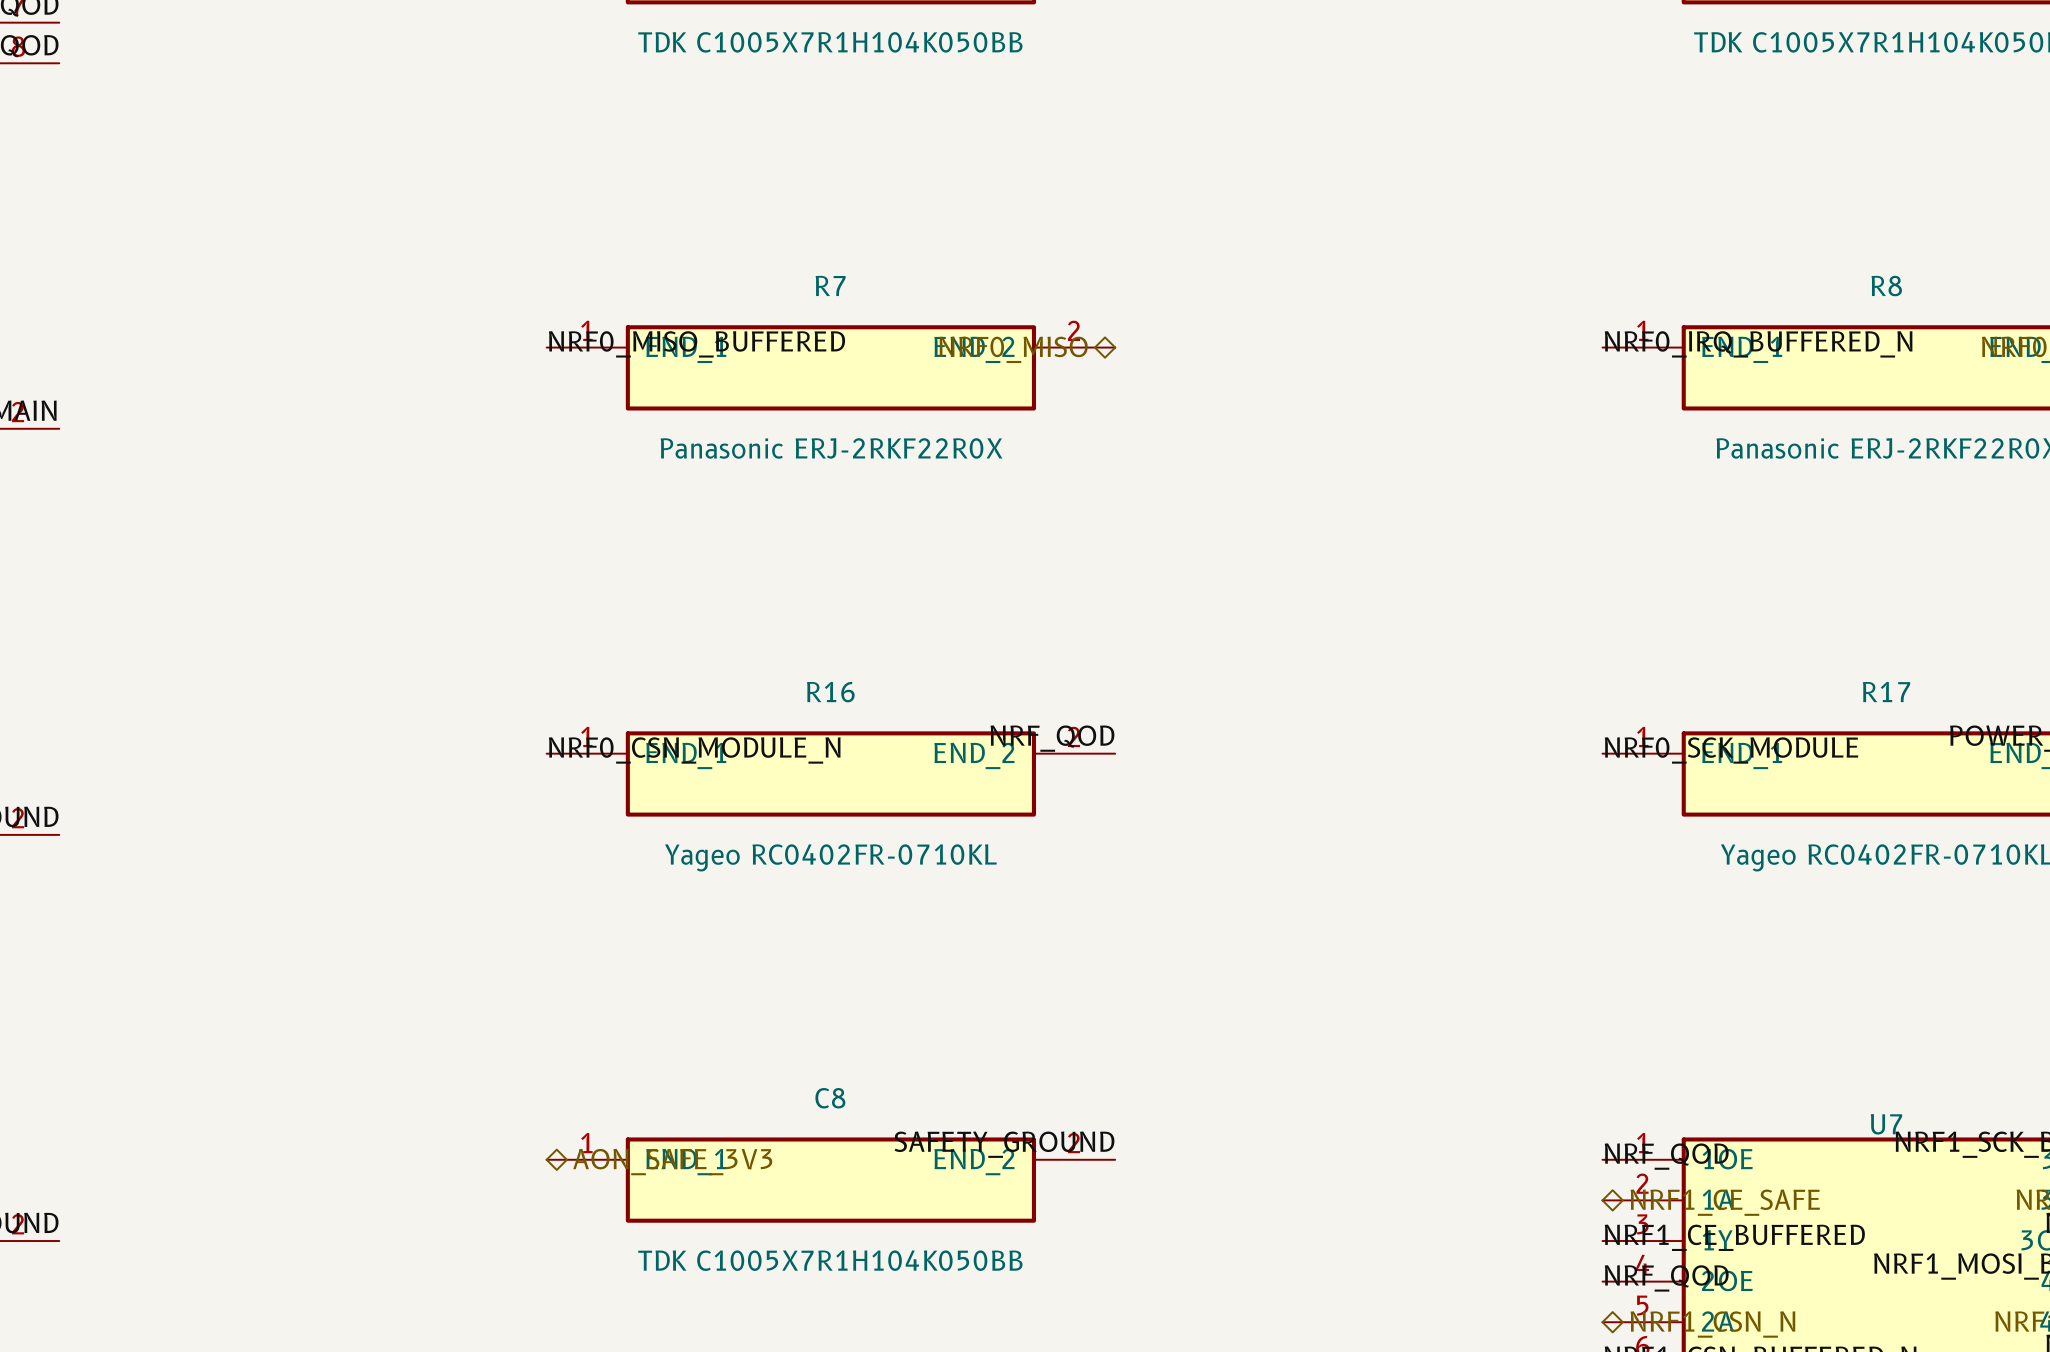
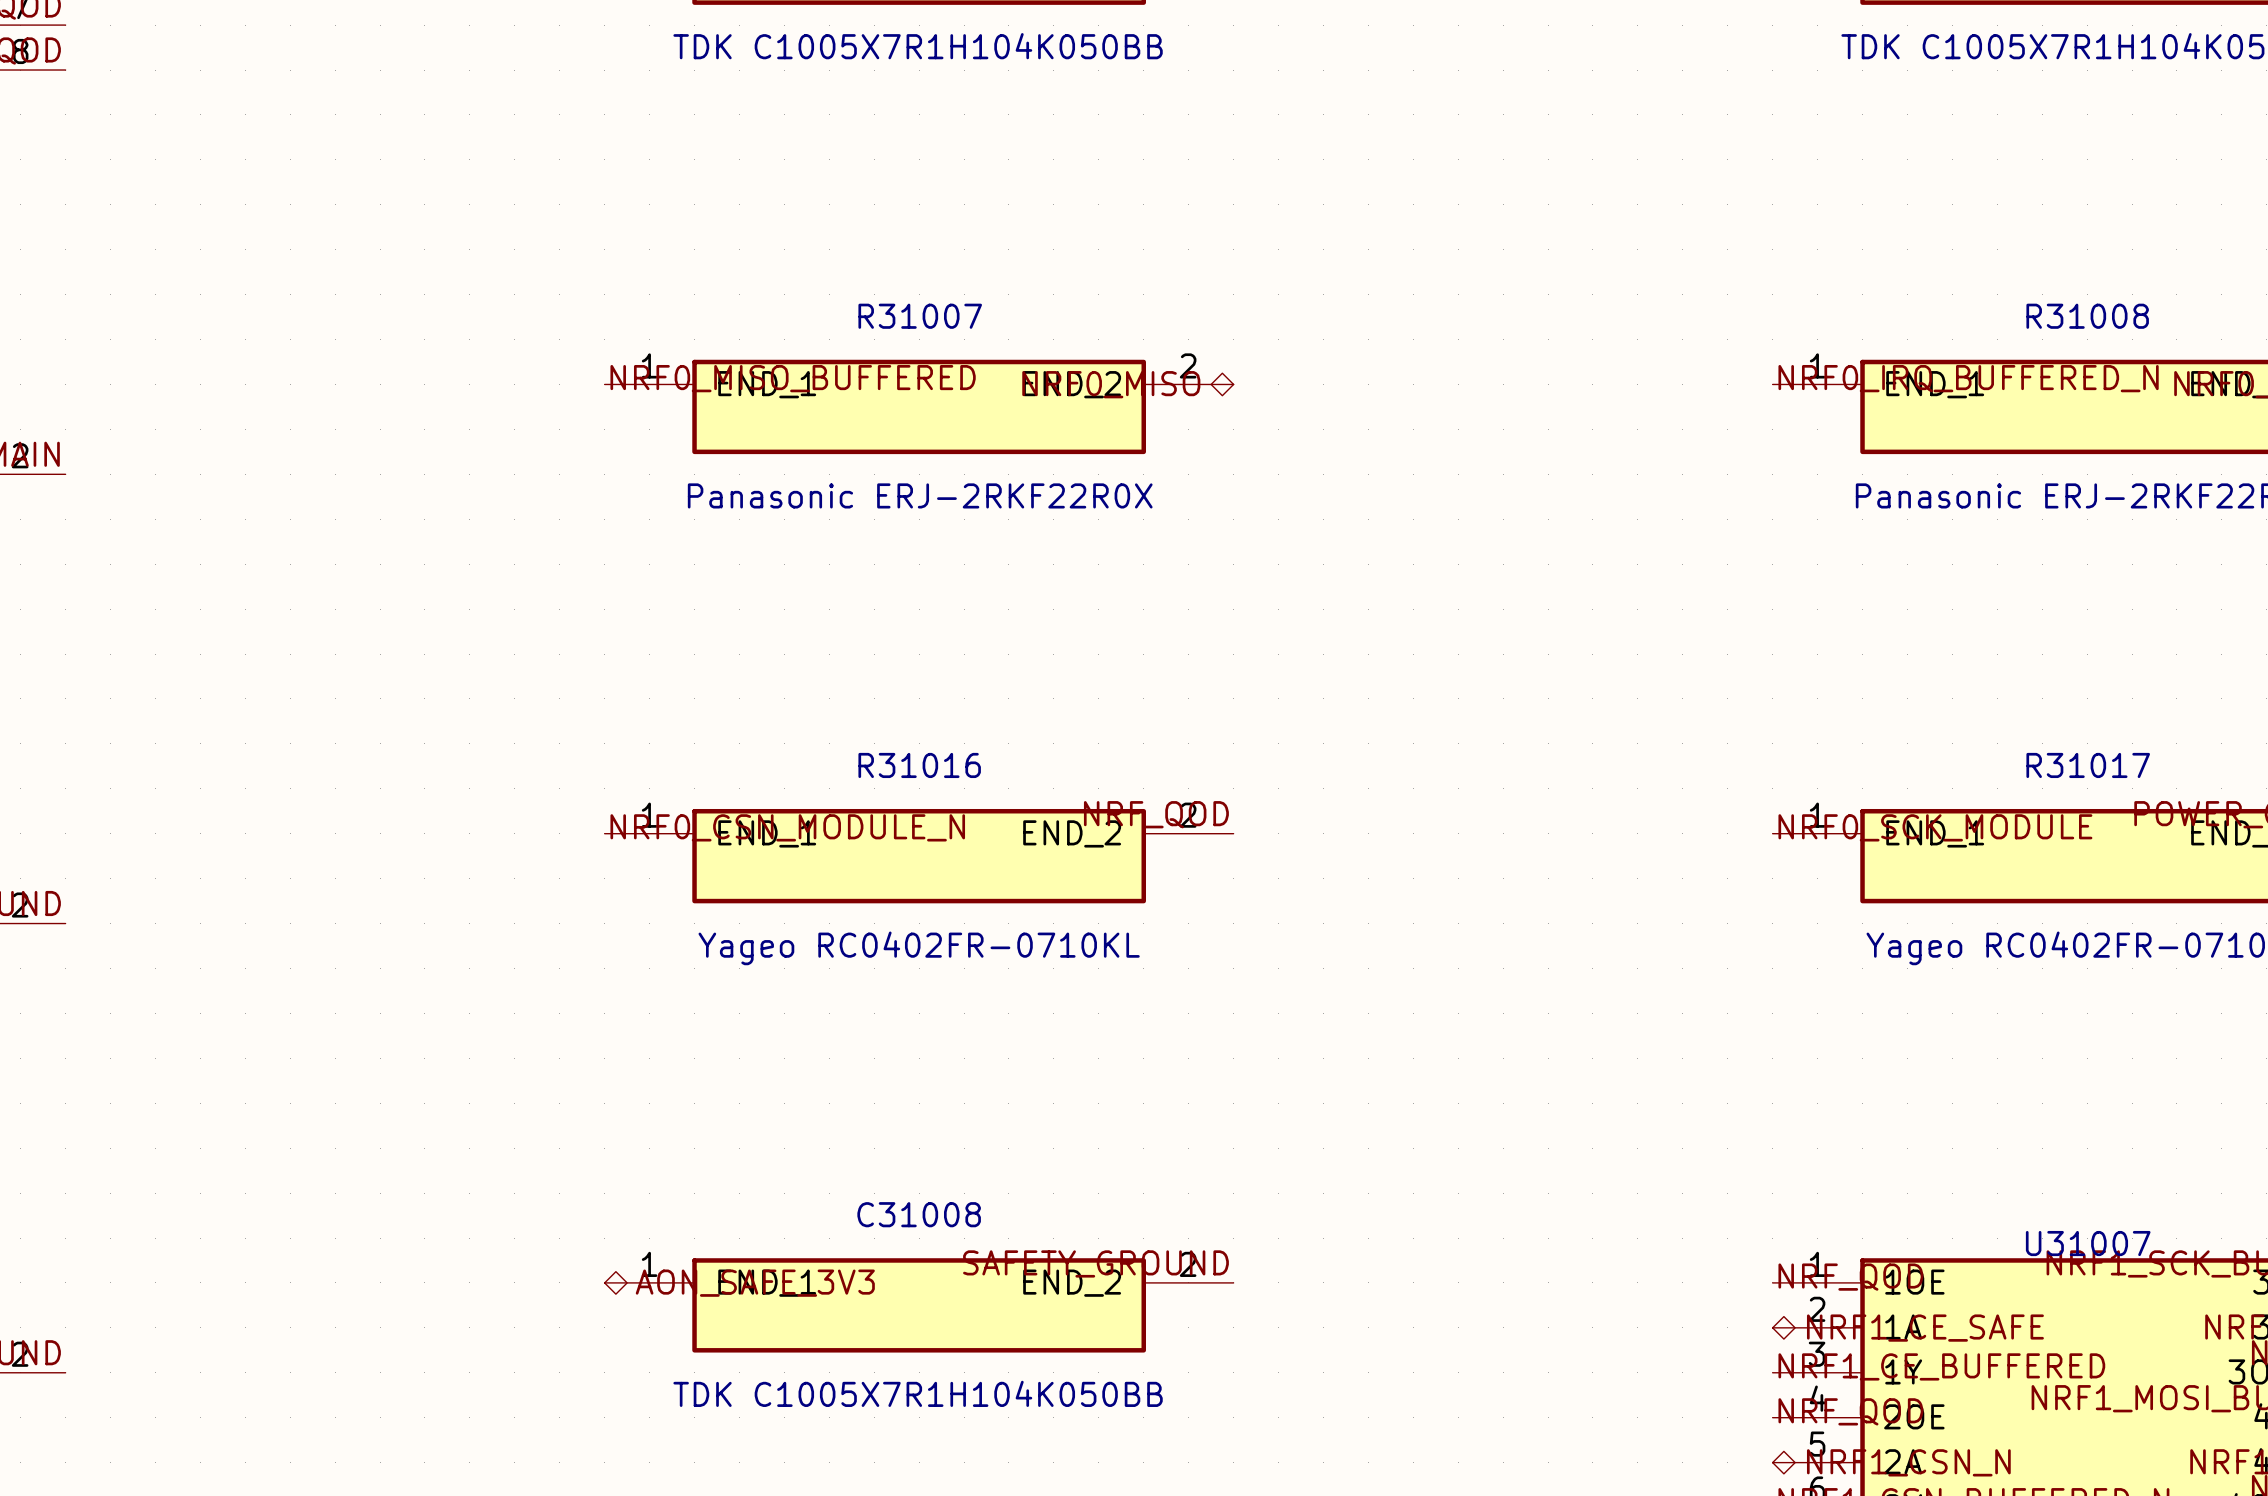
R7 name: R7 (830, 285) -> R31007 (920, 316)
R8 name: R8 (1886, 286) -> R31008 (2087, 316)
R16 name: R16 (830, 692) -> R31016 (919, 765)
R17 name: R17 (1886, 692) -> R31017 (2088, 765)
C8 name: C8 (830, 1098) -> C31008 (919, 1214)
U7 name: U7 (1886, 1124) -> U31007 (2088, 1243)

